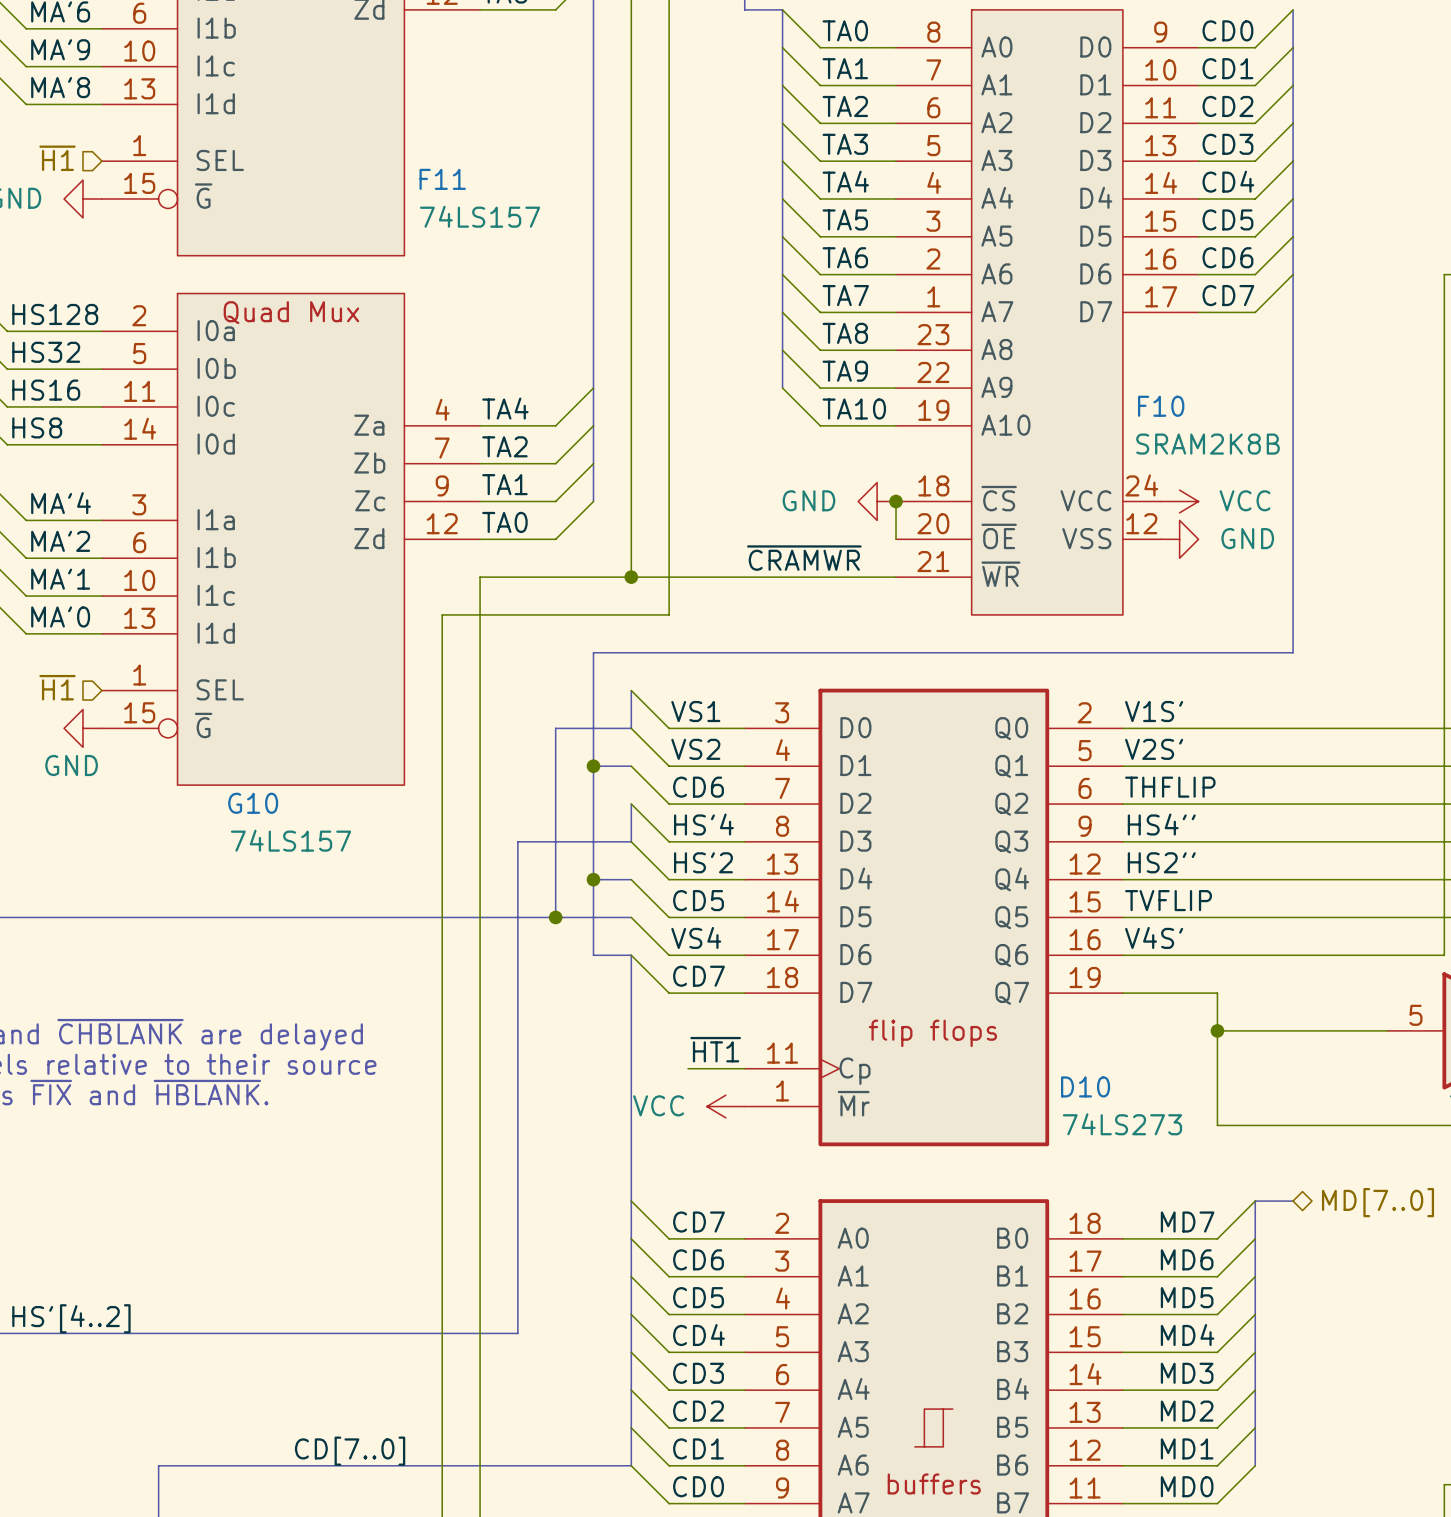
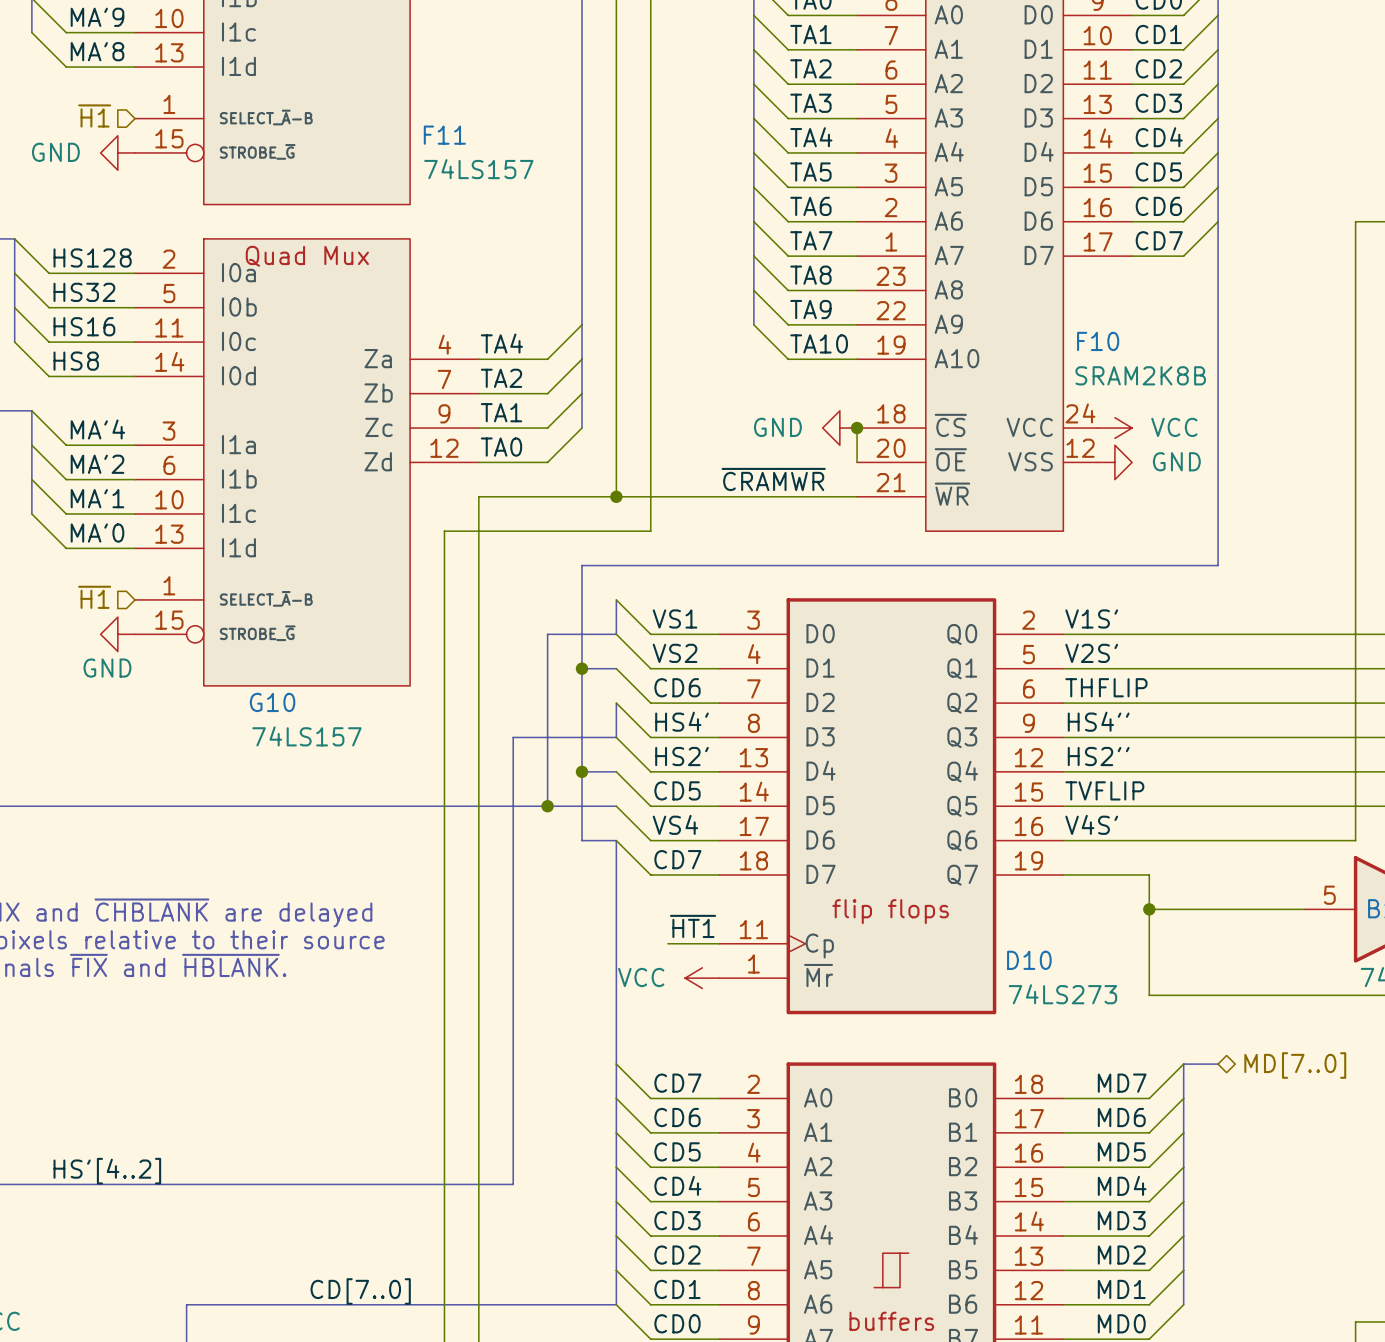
F11 pin name: SEL (220, 160) -> SELECT_~{A}-B (266, 117)
F11 pin name: ~{G} (203, 196) -> STROBE_~{G} (257, 151)
G10 pin name: SEL (220, 689) -> SELECT_~{A}-B (266, 598)
G10 pin name: ~{G} (203, 725) -> STROBE_~{G} (257, 633)
label: HS'4 (703, 824) -> HS4' (681, 721)
label: HS'2 (703, 862) -> HS2' (681, 756)

